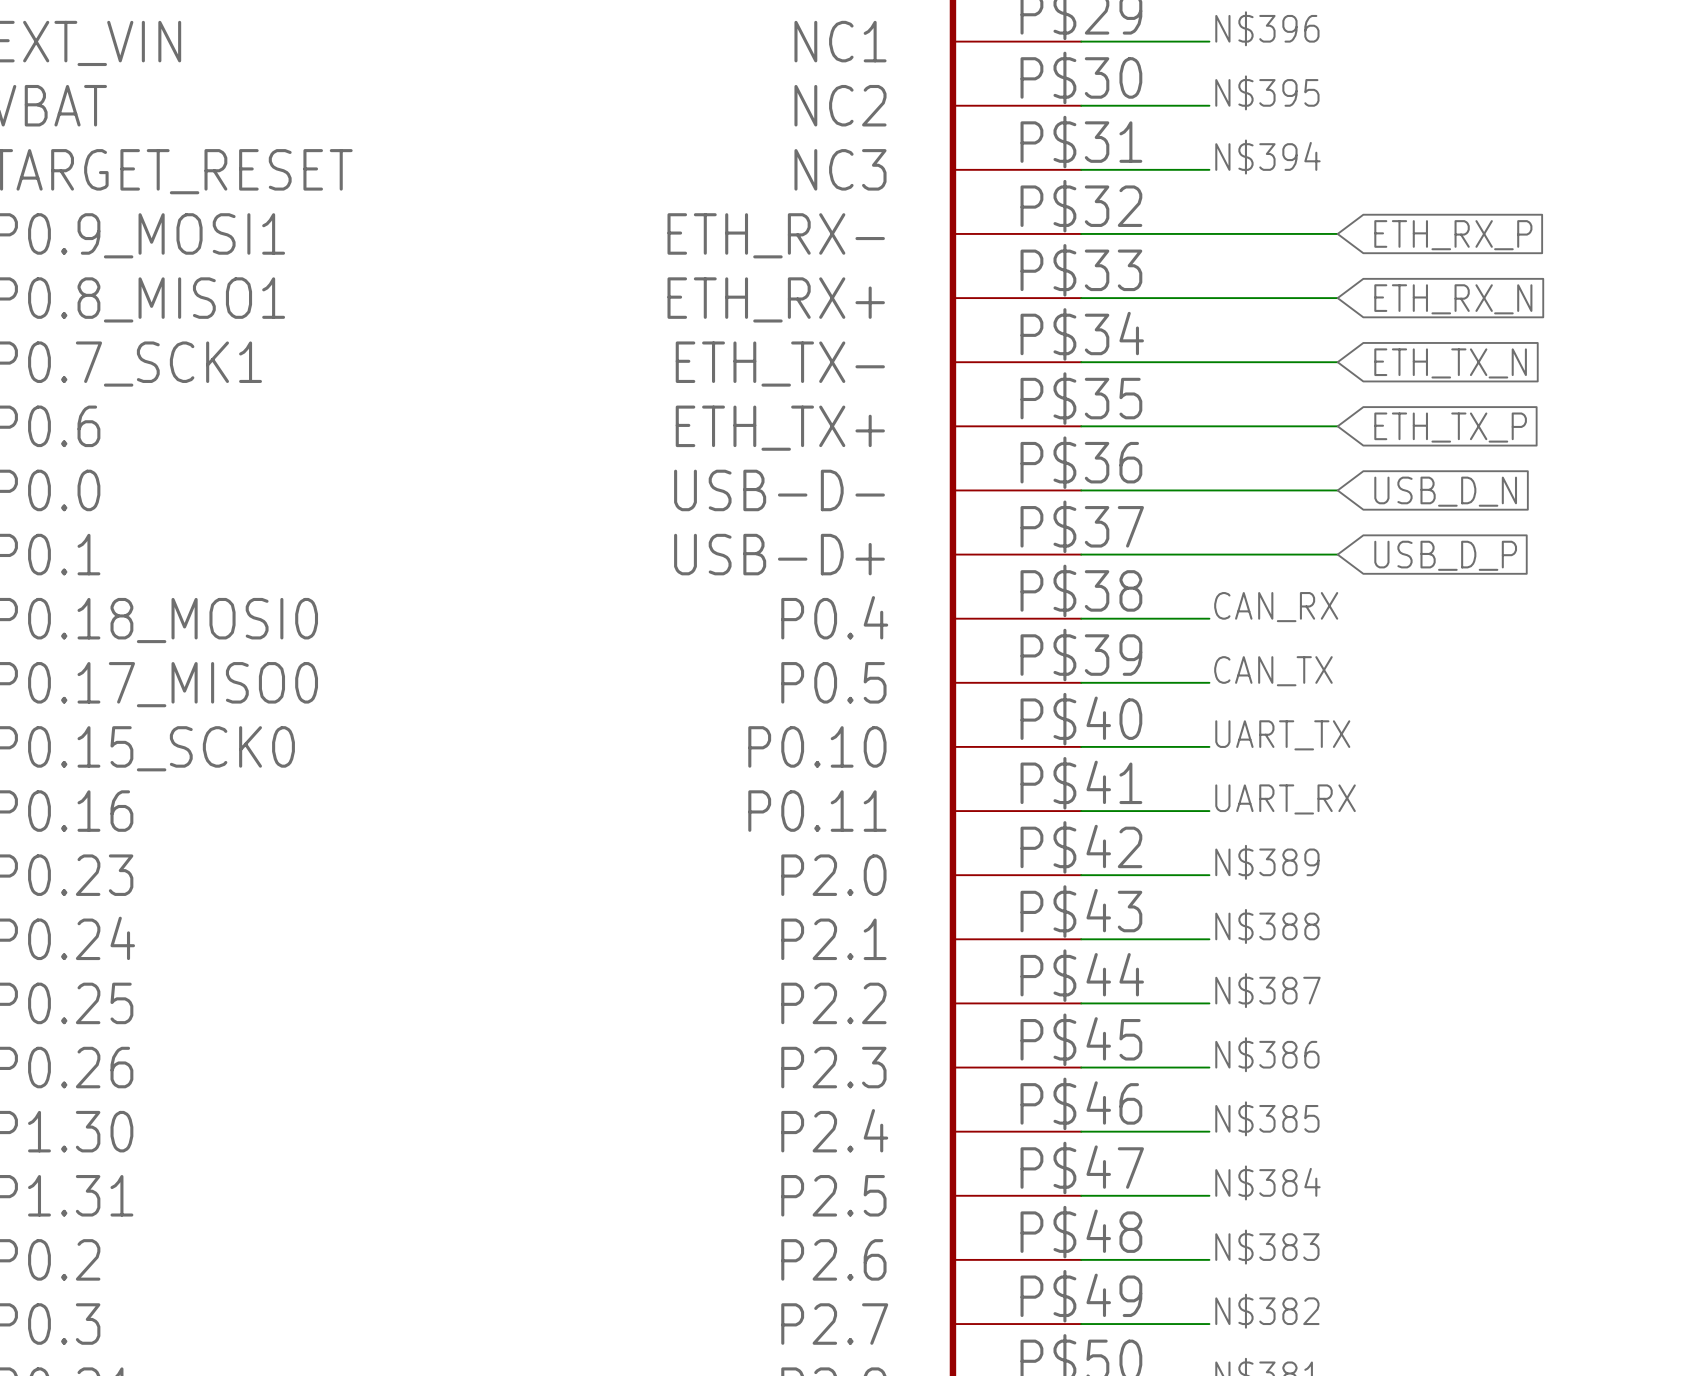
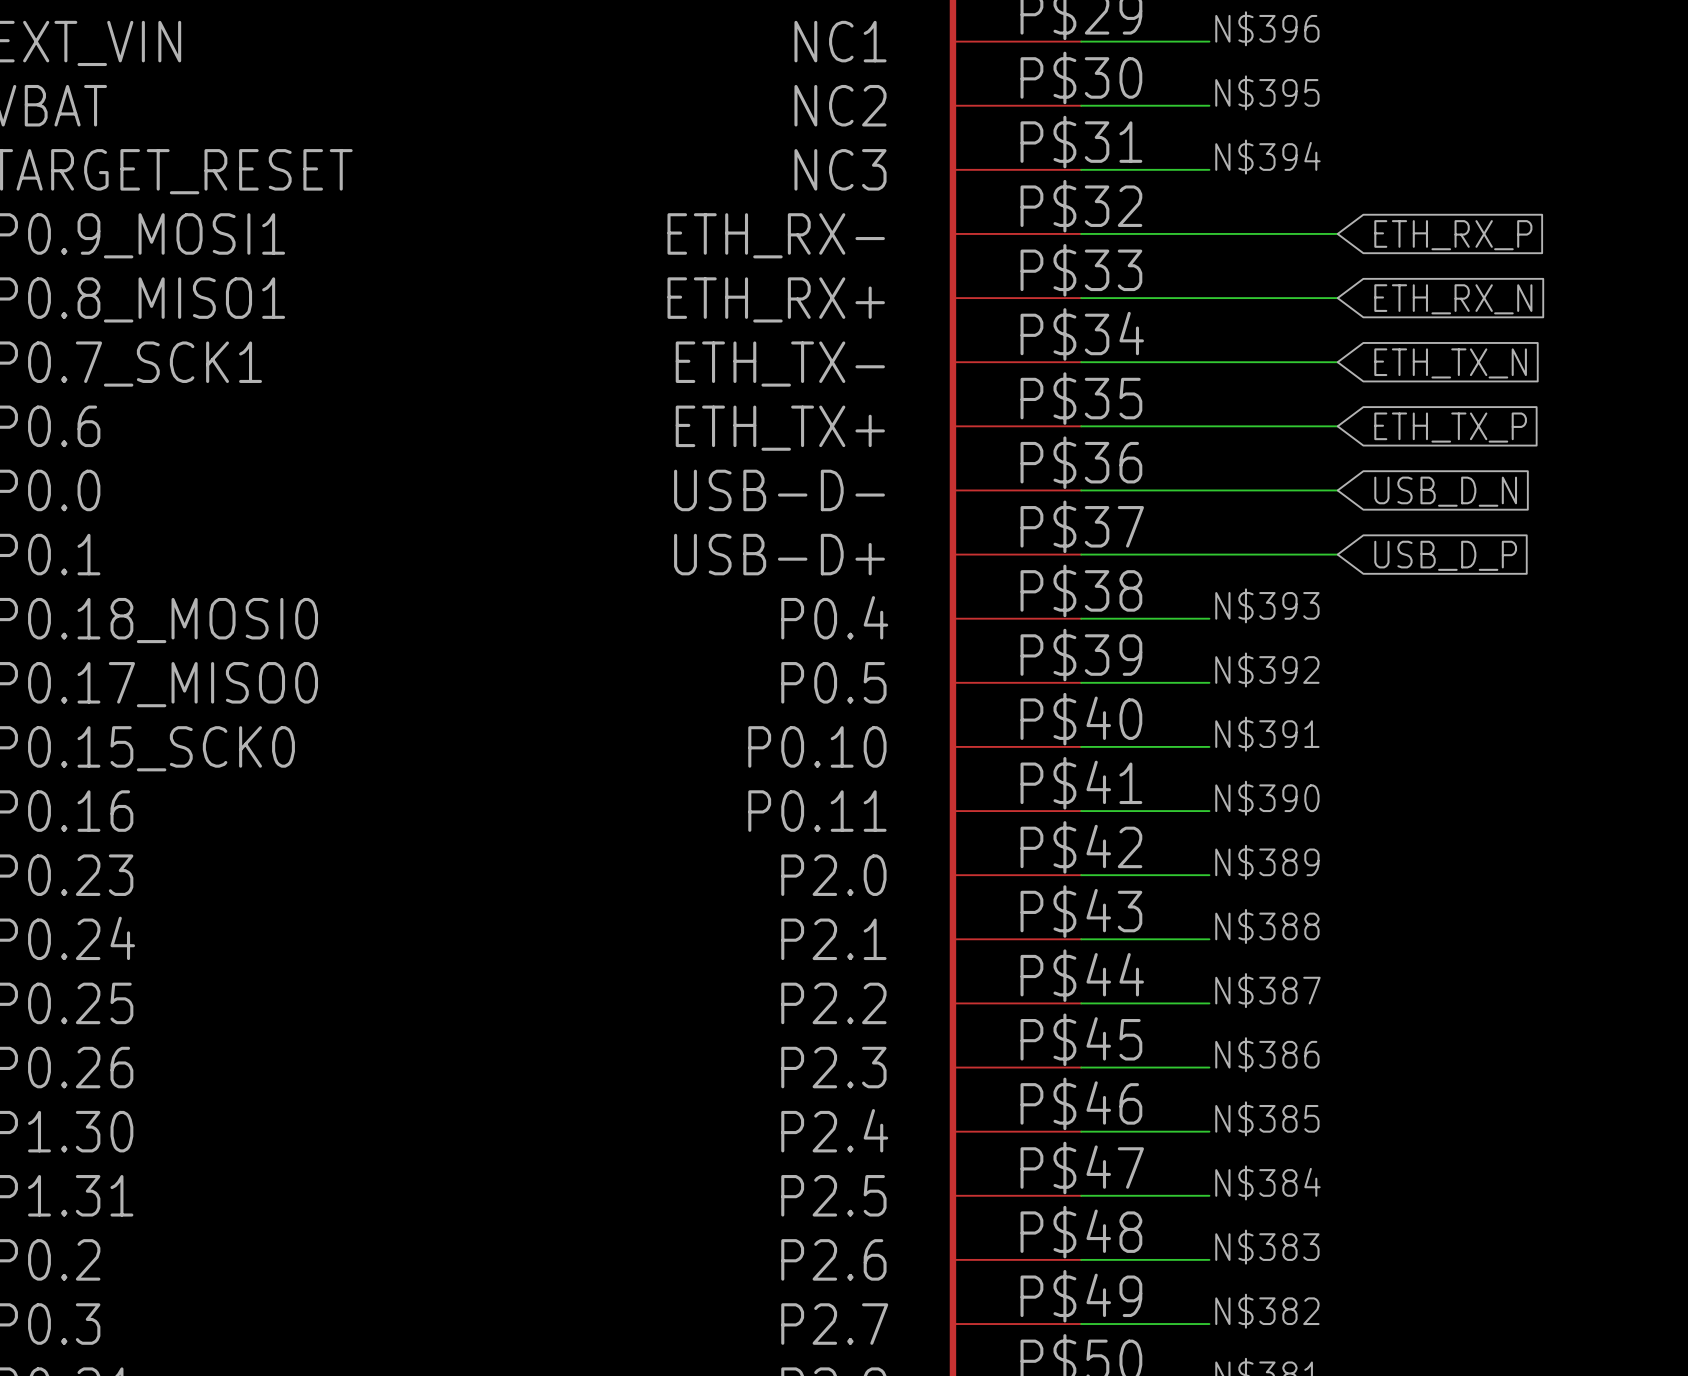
label: CAN_RX (1276, 607) -> N$393 (1267, 605)
label: CAN_TX (1273, 671) -> N$392 (1267, 669)
label: UART_TX (1282, 735) -> N$391 (1267, 734)
label: UART_RX (1285, 799) -> N$390 (1267, 798)

